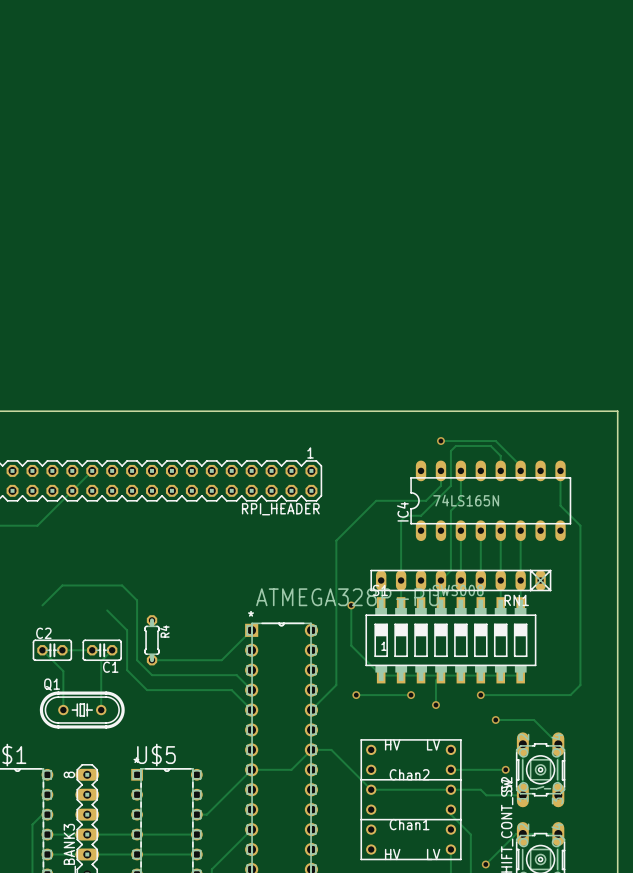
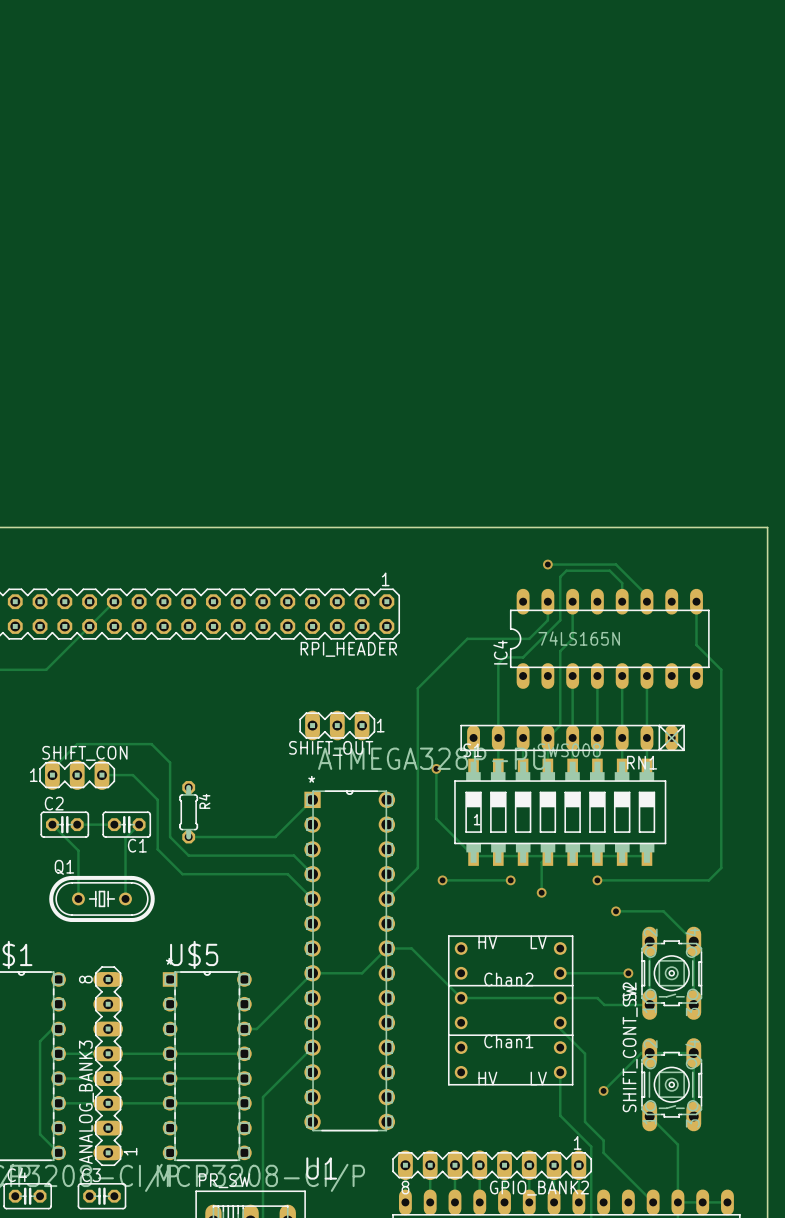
SHIFT_OUT: none -> (337, 725)
SHIFT_CON: none -> (77, 775)
track: none -> (101, 775) (132, 775)

